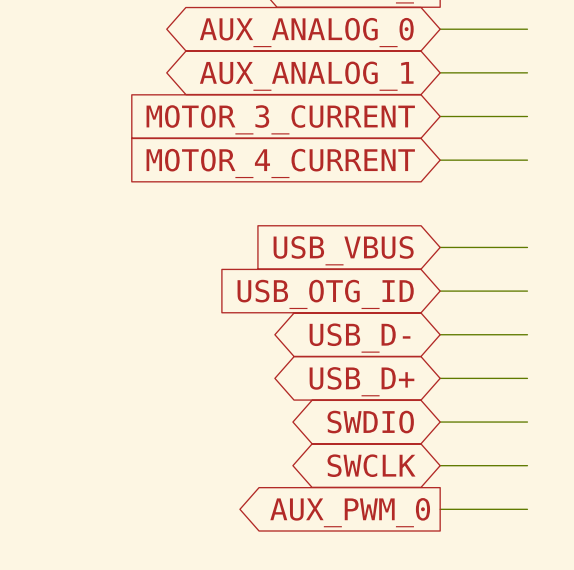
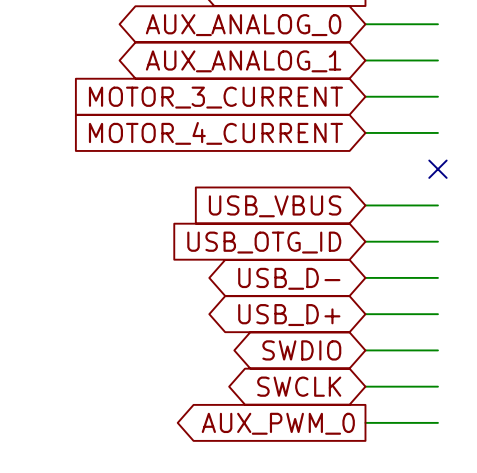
no-connect mark: none -> (437, 169)

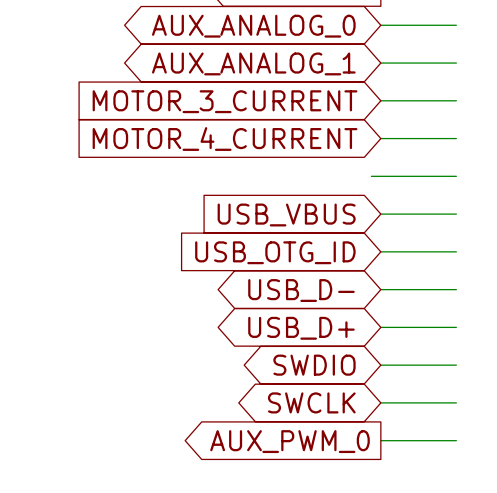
wire: none -> (371, 176) (456, 176)
no-connect mark: (437, 169) -> none

